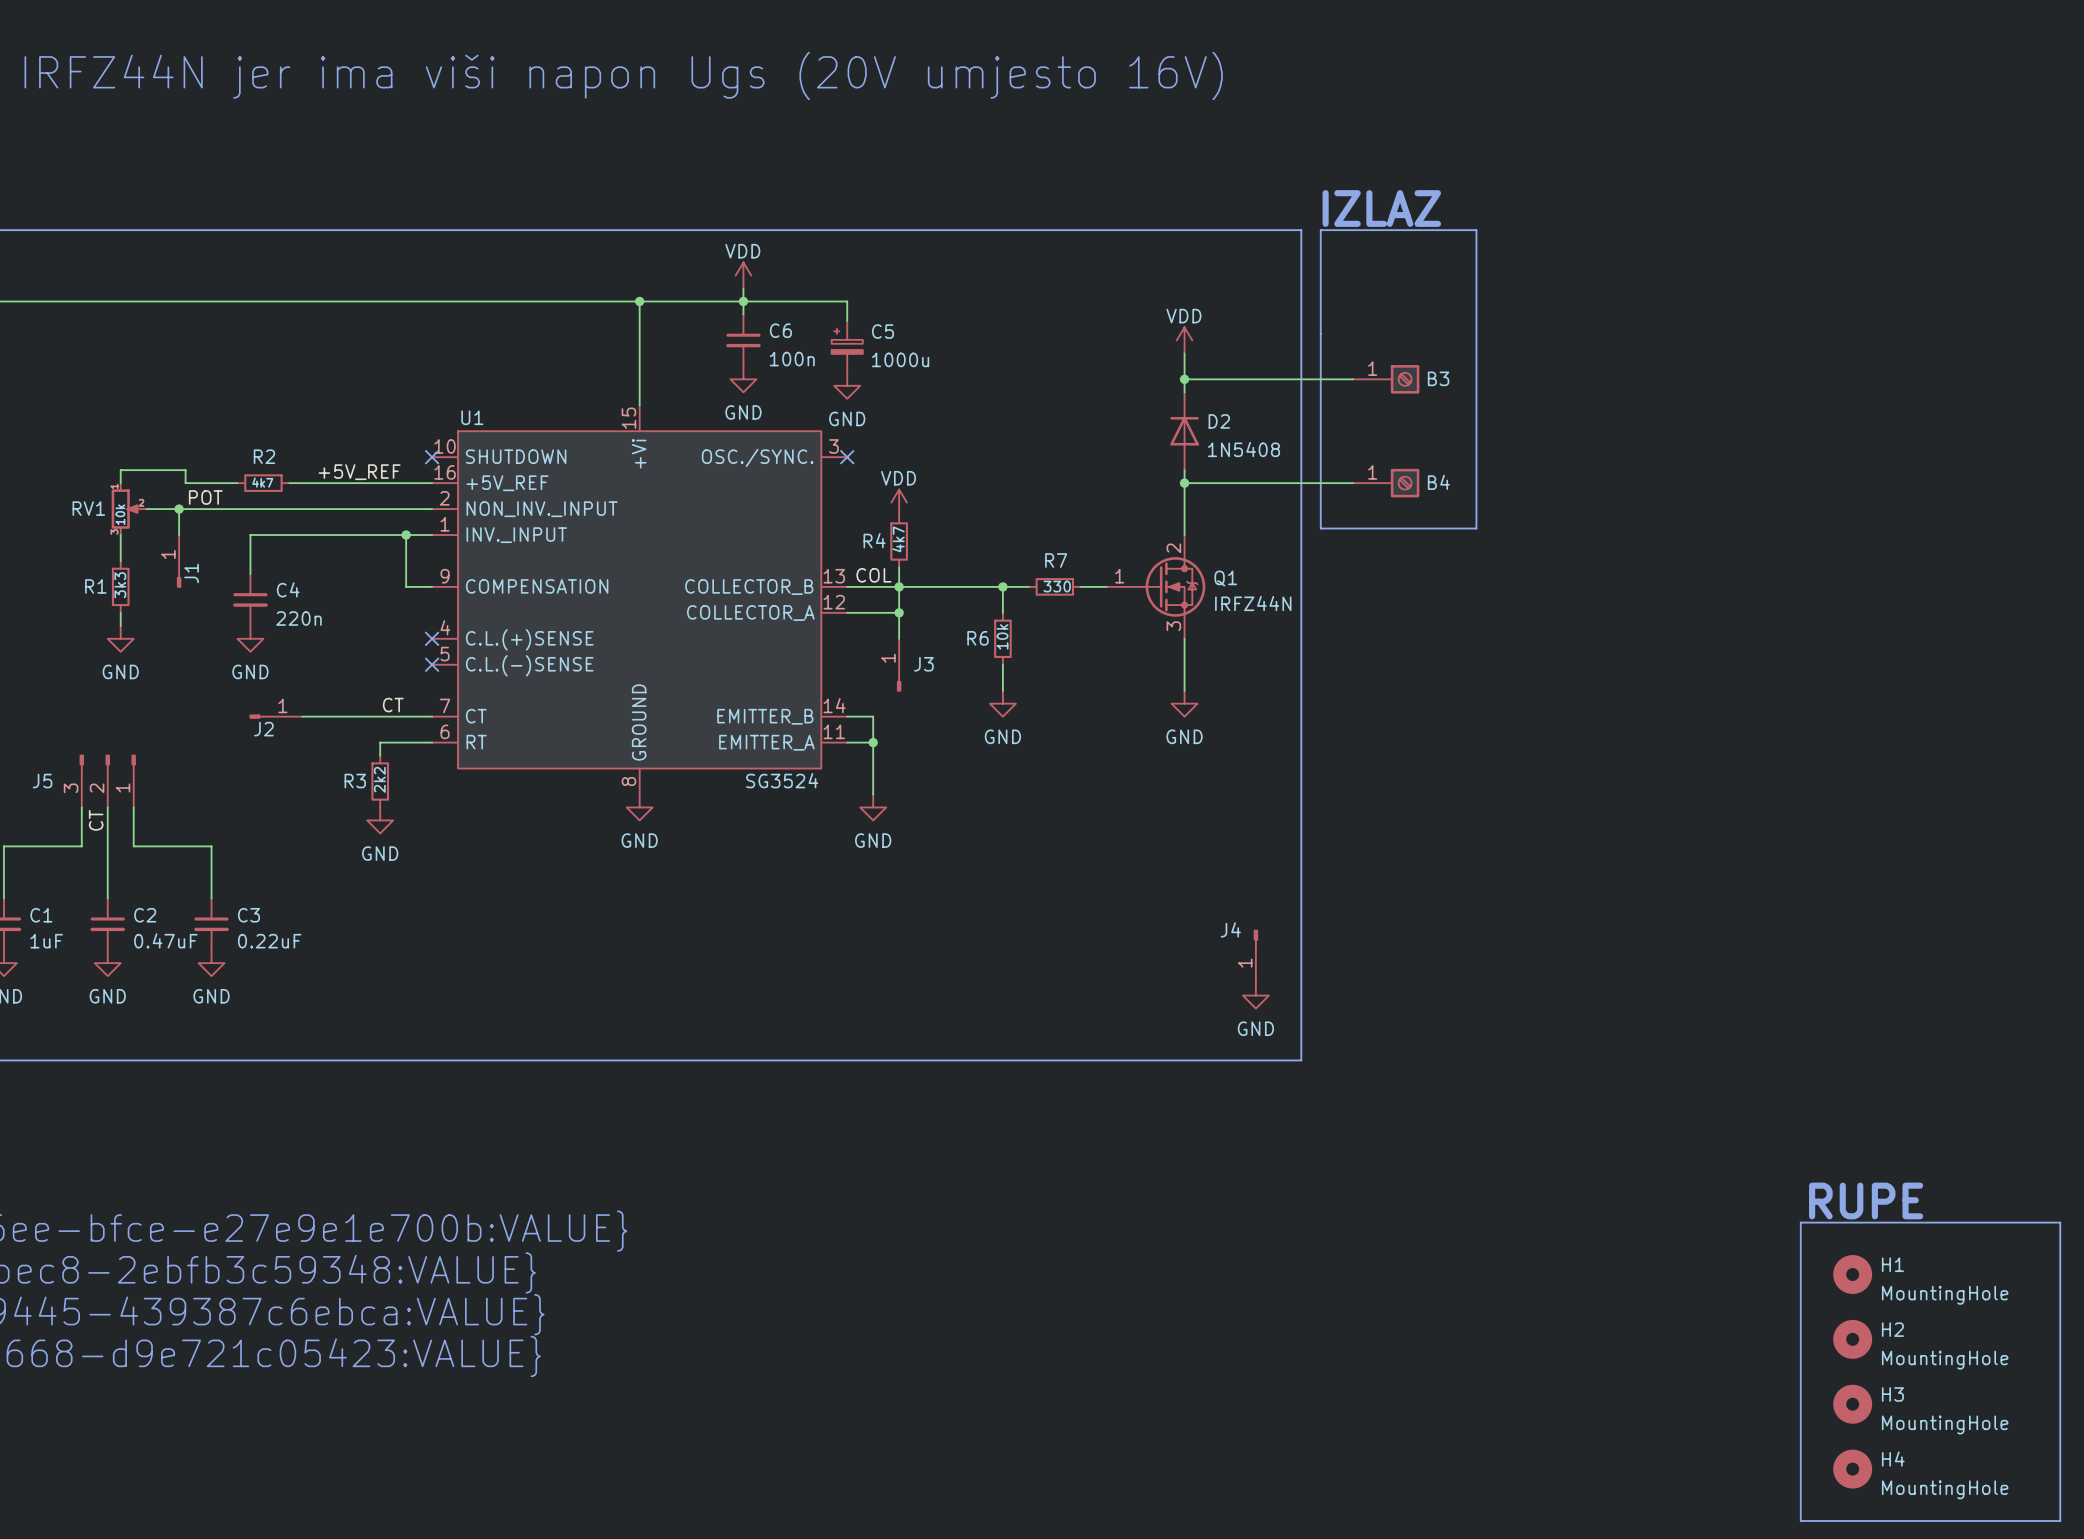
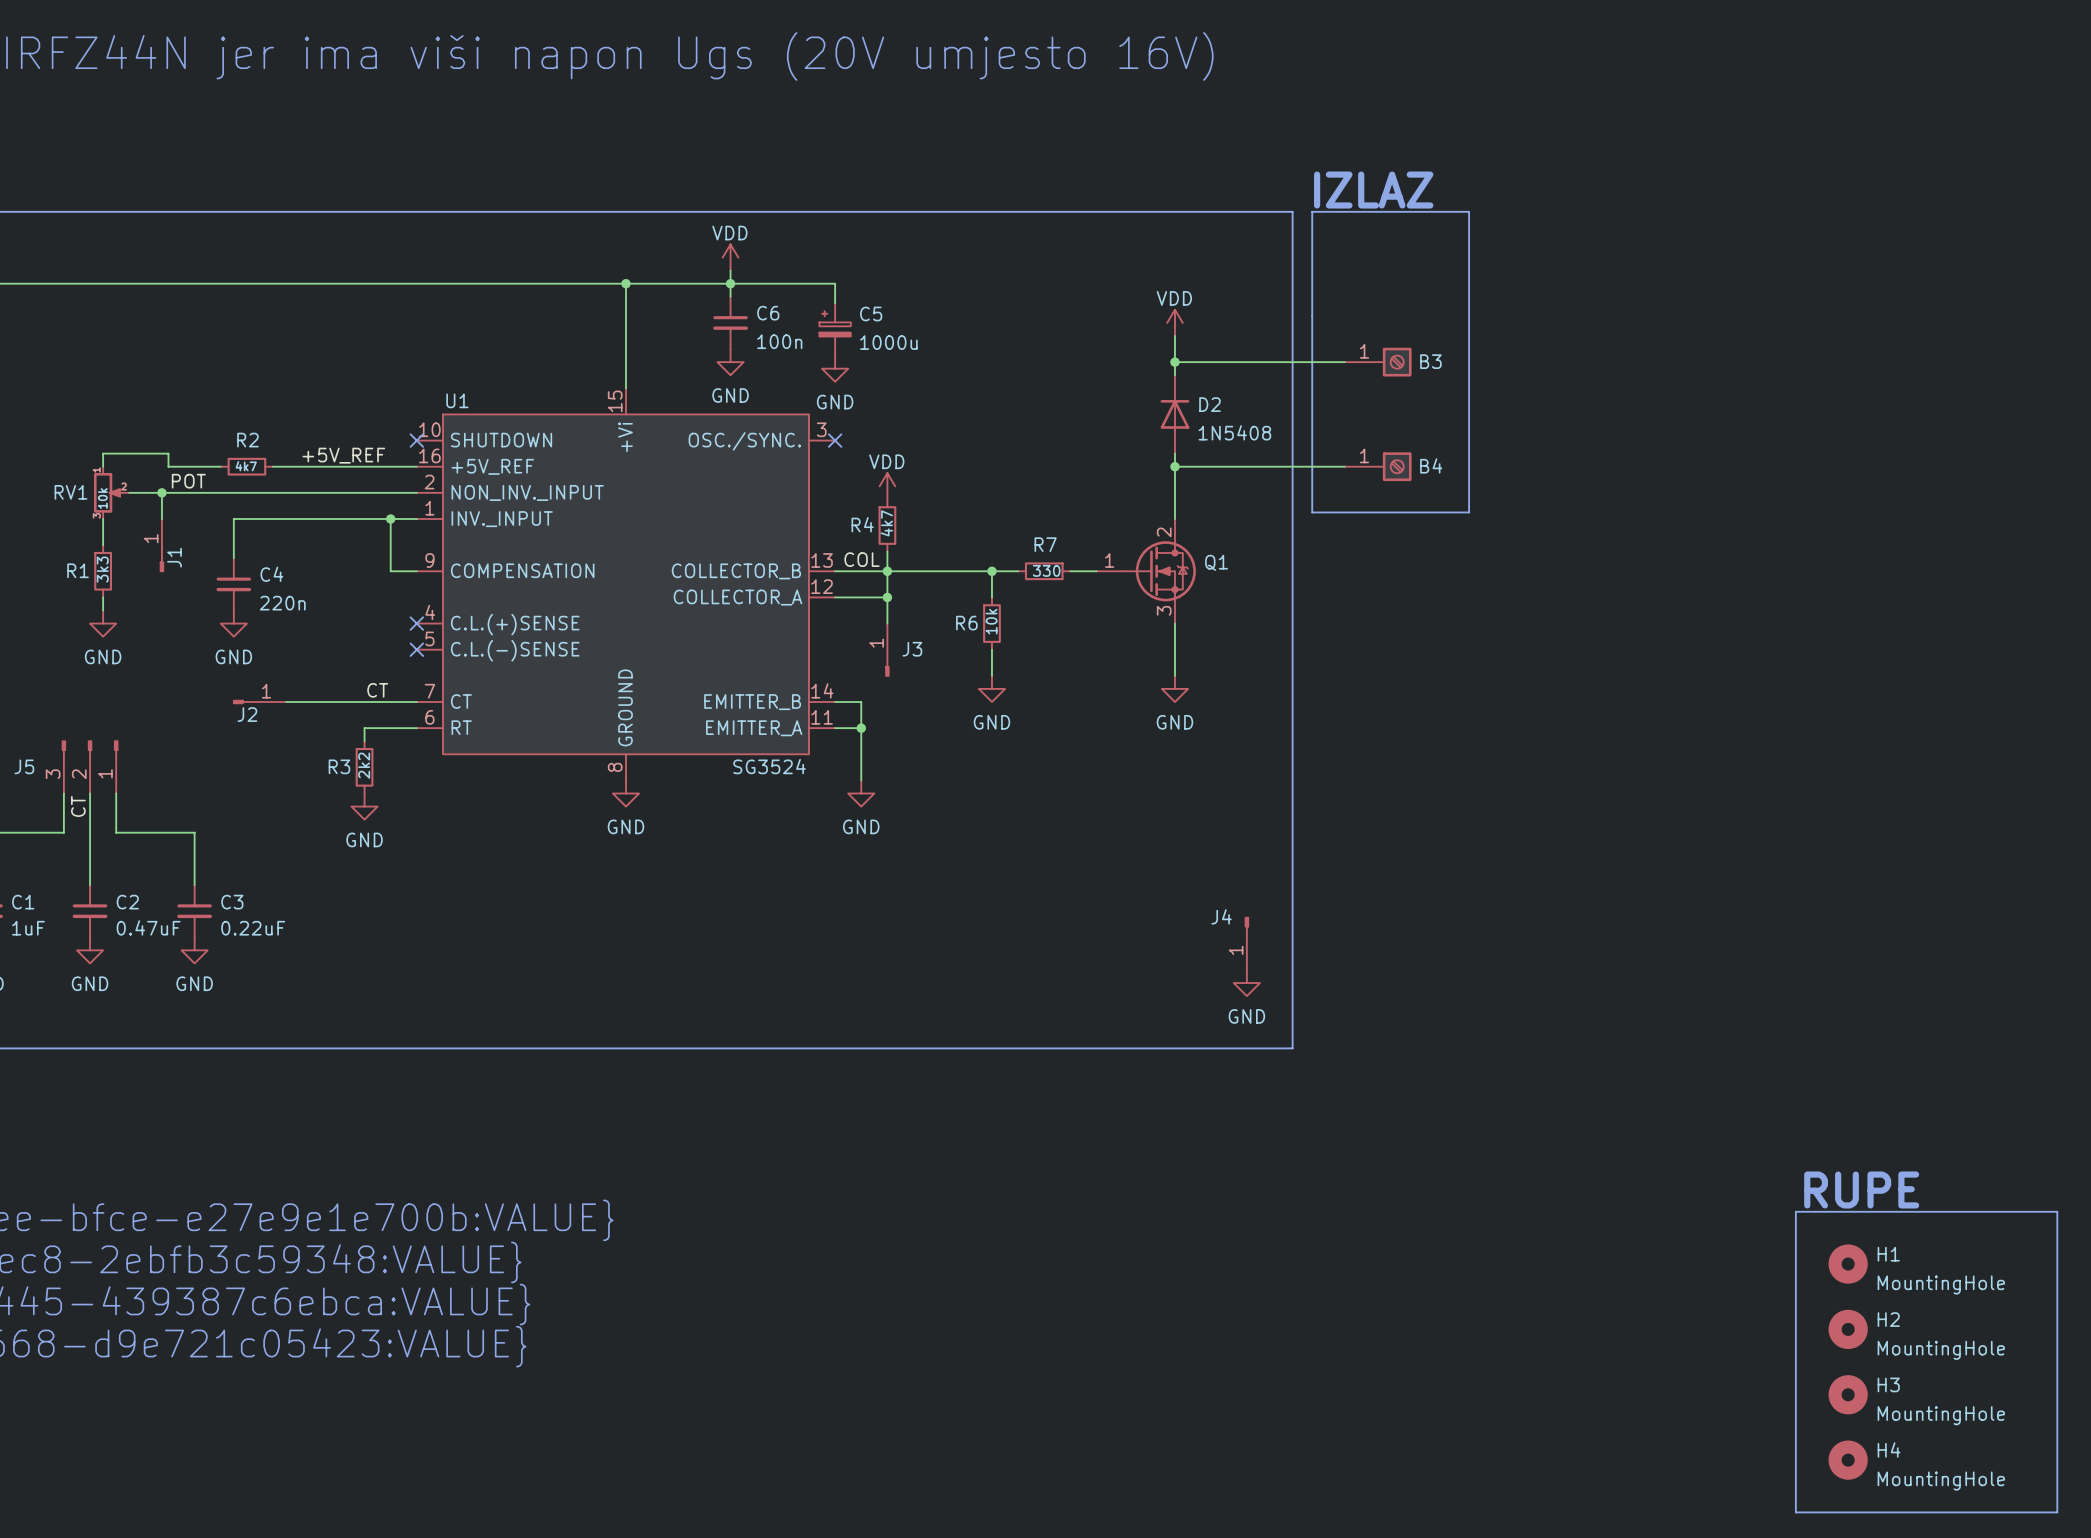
Q1 value: IRFZ44N (1253, 603) -> none

